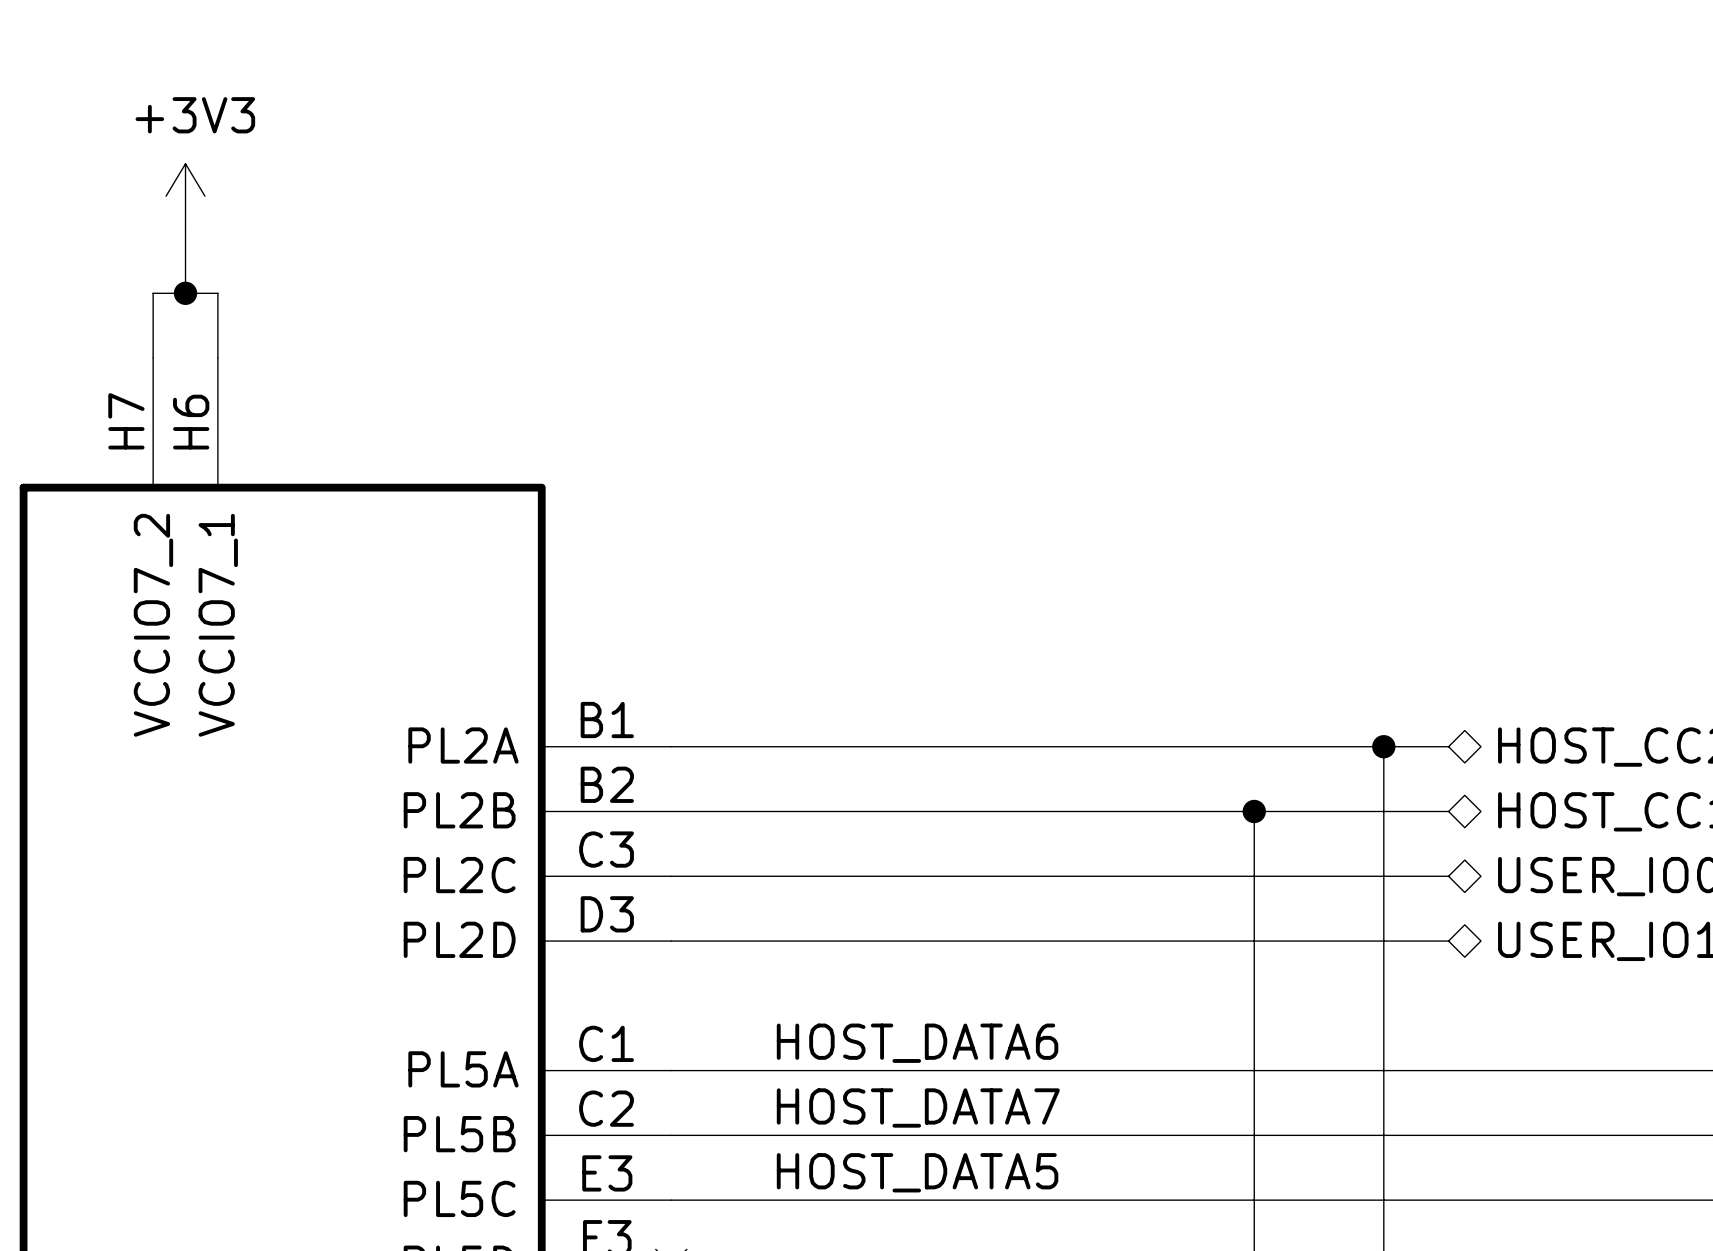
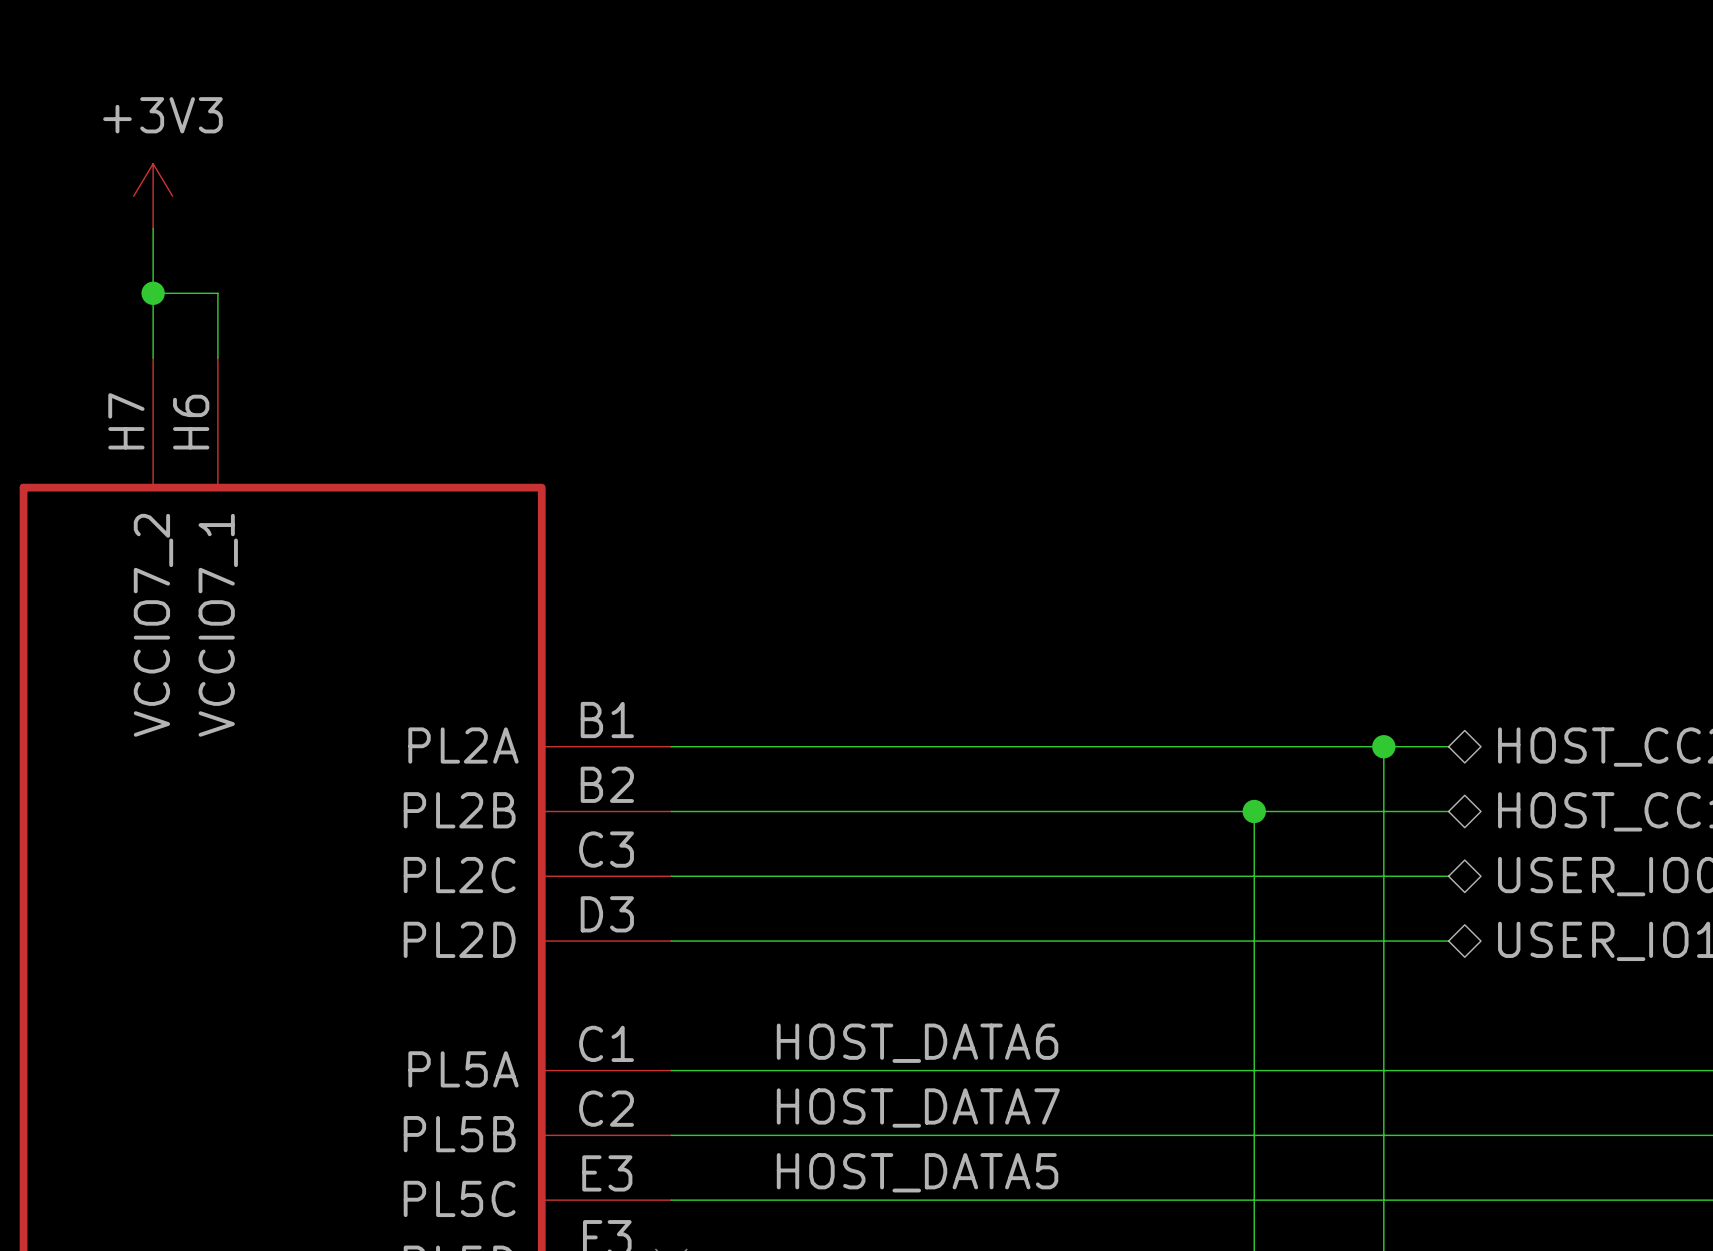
power symbol position: +3V3 (185, 196) -> +3V3 (153, 196)
wire: (185, 228) (185, 293) -> (153, 228) (153, 293)
junction position: (185, 293) -> (153, 293)

